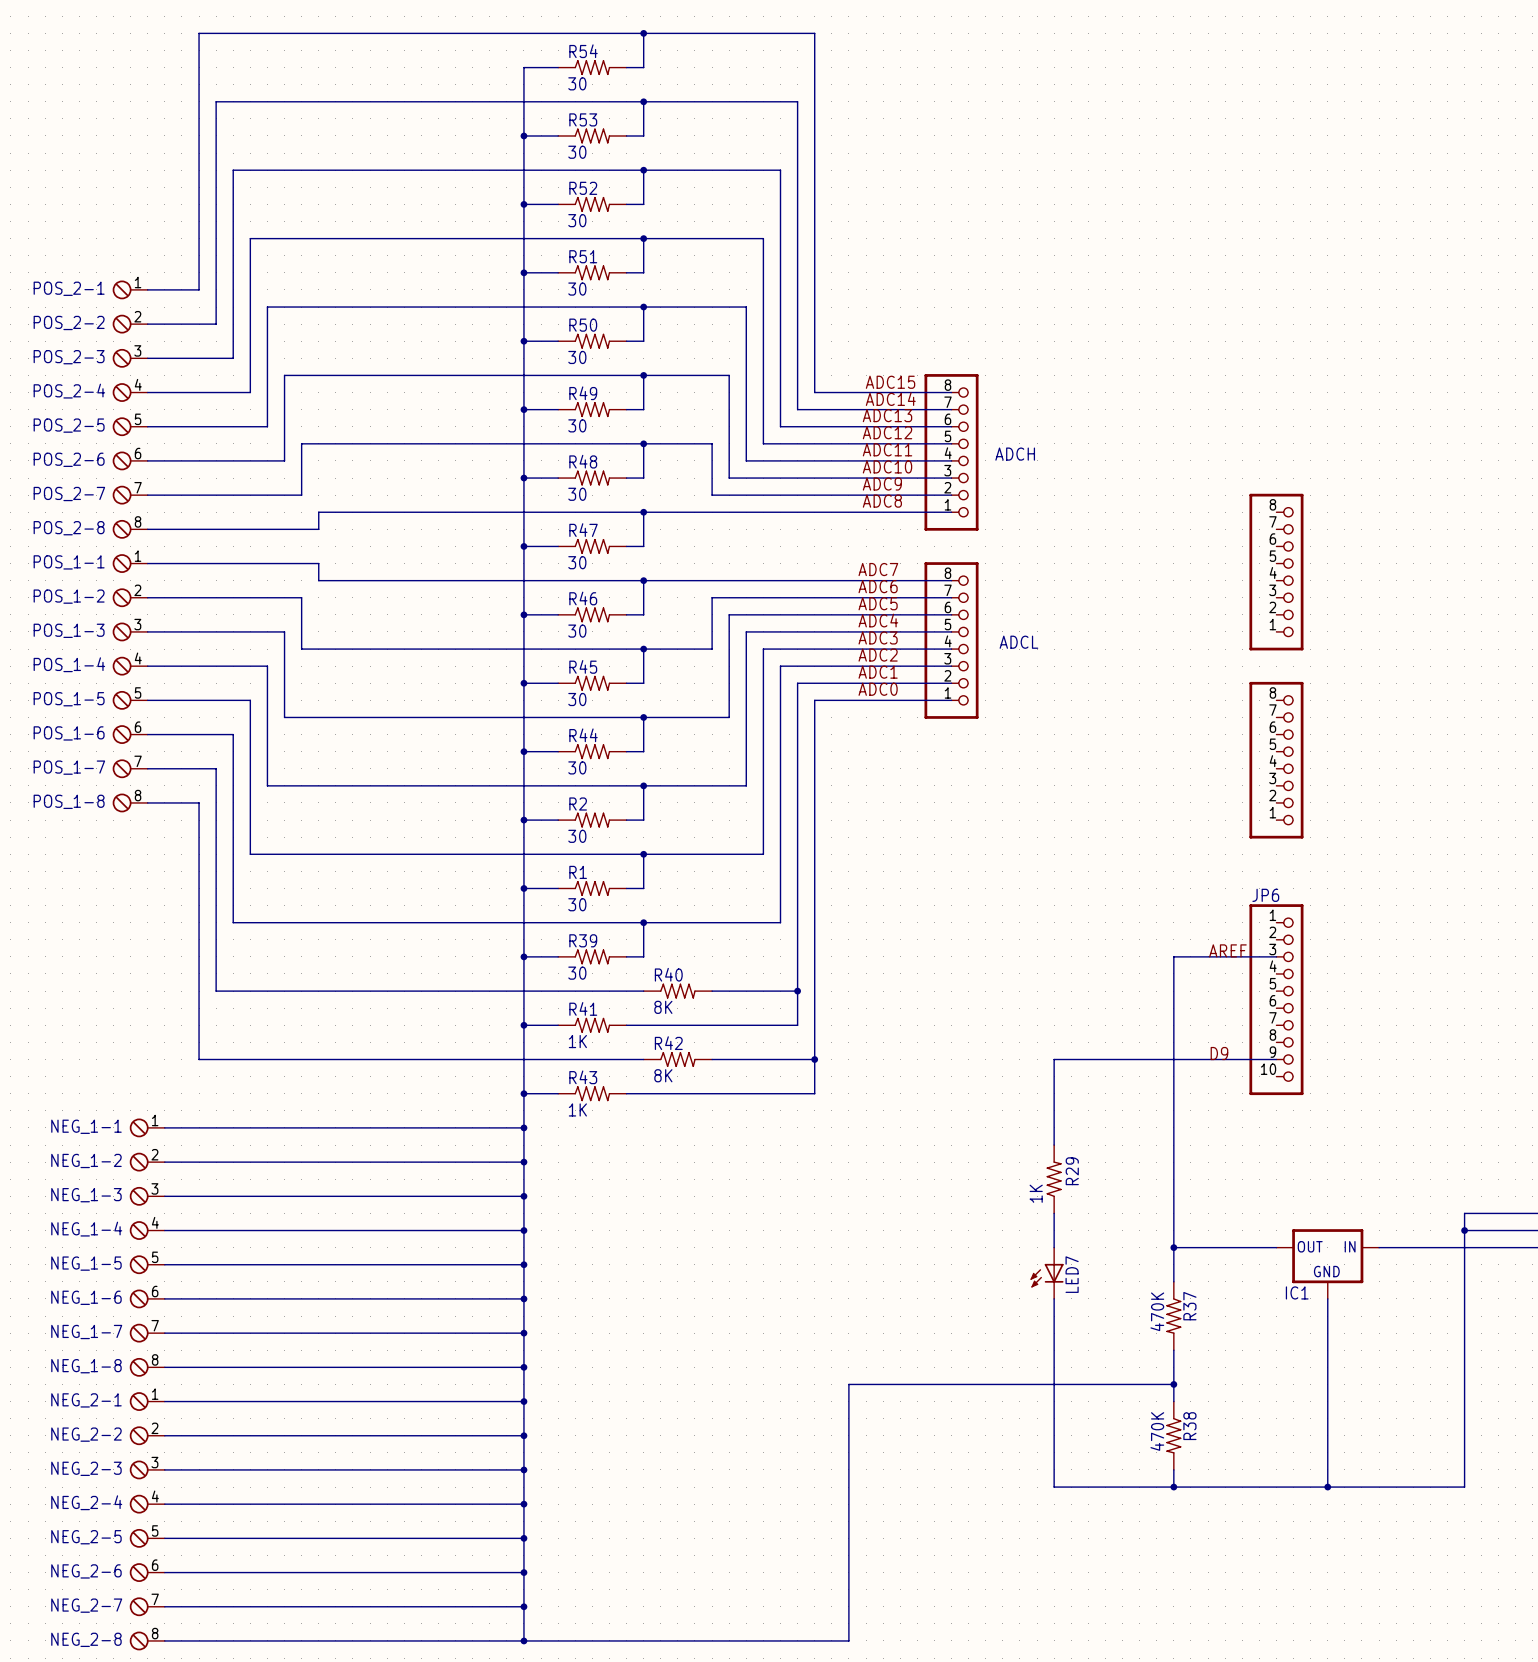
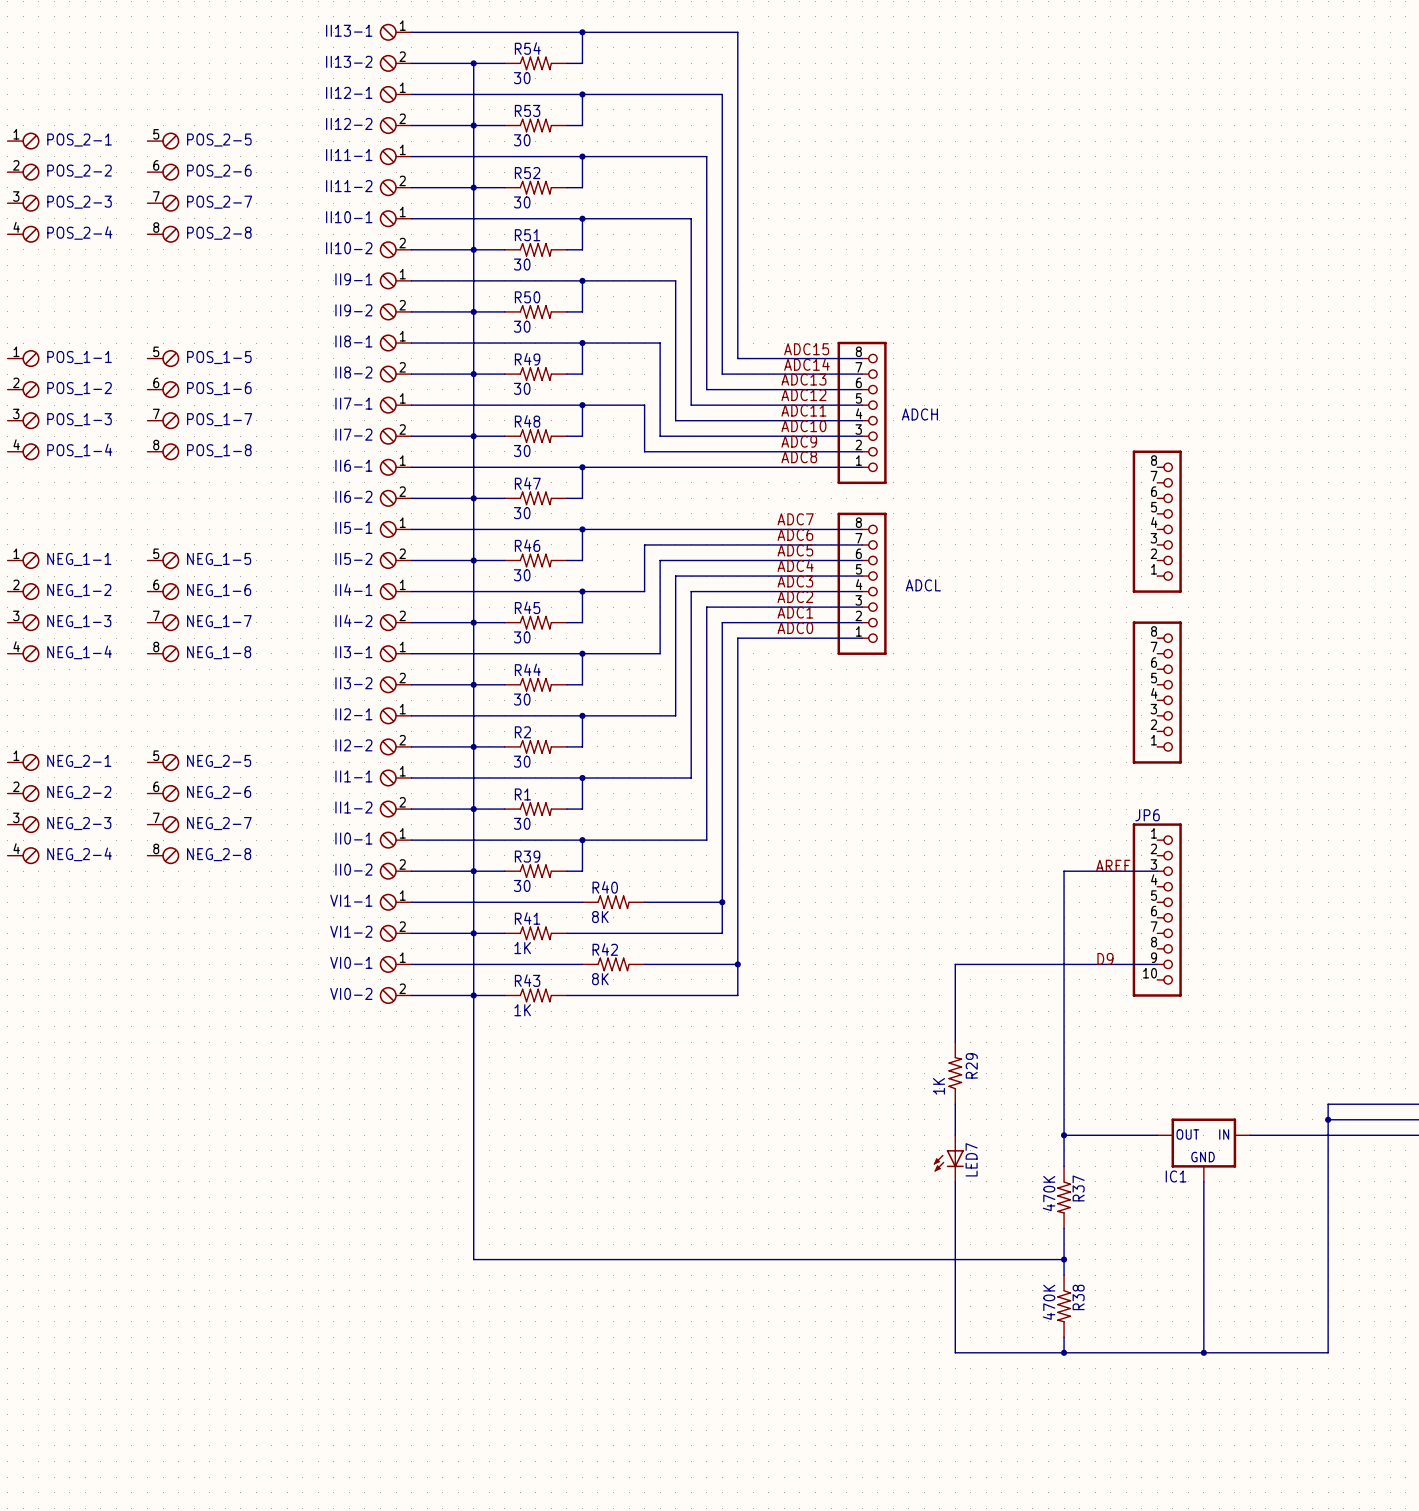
II13-1: none -> (395, 32)
wire: (455, 33) (199, 33) (199, 289) (147, 289) -> none
II13-2: none -> (395, 63)
wire: none -> (411, 63) (473, 63)
junction: none -> (473, 63)
II12-1: none -> (395, 94)
wire: (455, 101) (216, 101) (216, 324) (147, 324) -> none
II12-2: none -> (395, 125)
wire: none -> (411, 125) (473, 125)
II11-1: none -> (395, 156)
wire: (455, 170) (233, 170) (233, 358) (147, 358) -> none
II11-2: none -> (395, 187)
wire: none -> (411, 187) (473, 187)
II10-1: none -> (395, 218)
wire: (455, 238) (250, 238) (250, 392) (147, 392) -> none
II10-2: none -> (395, 249)
wire: none -> (411, 249) (473, 249)
POS_2-1 flip: as is (122, 289) -> left-right (30, 141)
POS_2-1 position: (130, 289) -> (23, 141)
II9-1: none -> (395, 280)
wire: (455, 307) (267, 307) (267, 426) (147, 426) -> none
POS_2-2 flip: as is (122, 324) -> left-right (30, 172)
POS_2-2 position: (130, 324) -> (23, 172)
II9-2: none -> (395, 311)
wire: none -> (411, 311) (473, 311)
POS_2-3 flip: as is (122, 358) -> left-right (30, 203)
POS_2-3 position: (130, 358) -> (23, 203)
II8-1: none -> (395, 343)
wire: (455, 375) (284, 375) (284, 460) (147, 460) -> none
POS_2-4 flip: as is (122, 392) -> left-right (30, 234)
POS_2-4 position: (130, 392) -> (23, 234)
II8-2: none -> (395, 374)
wire: none -> (411, 374) (473, 374)
POS_2-5 flip: as is (122, 426) -> left-right (170, 141)
POS_2-5 position: (130, 426) -> (163, 141)
II7-1: none -> (395, 405)
wire: (455, 443) (301, 443) (301, 495) (147, 495) -> none
POS_2-6 flip: as is (122, 460) -> left-right (170, 172)
POS_2-6 position: (130, 460) -> (163, 172)
II7-2: none -> (395, 436)
wire: none -> (411, 436) (473, 436)
POS_2-7 flip: as is (122, 495) -> left-right (170, 203)
POS_2-7 position: (130, 495) -> (163, 203)
II6-1: none -> (395, 467)
wire: (455, 512) (318, 512) (318, 529) (147, 529) -> none
POS_2-8 flip: as is (122, 529) -> left-right (170, 234)
POS_2-8 position: (130, 529) -> (163, 234)
II6-2: none -> (395, 498)
wire: none -> (411, 498) (473, 498)
POS_1-1 flip: as is (122, 563) -> left-right (30, 358)
POS_1-1 position: (130, 563) -> (23, 358)
wire: (147, 563) (318, 563) (318, 580) (455, 580) -> none
II5-1: none -> (395, 529)
POS_1-2 flip: as is (122, 597) -> left-right (30, 389)
POS_1-2 position: (130, 597) -> (23, 389)
wire: (147, 597) (301, 597) (301, 649) (455, 649) -> none
II5-2: none -> (395, 560)
wire: none -> (411, 560) (473, 560)
POS_1-3 flip: as is (122, 631) -> left-right (30, 420)
POS_1-3 position: (130, 631) -> (23, 420)
wire: (147, 631) (284, 631) (284, 717) (455, 717) -> none
II4-1: none -> (395, 591)
POS_1-4 flip: as is (122, 666) -> left-right (30, 451)
POS_1-4 position: (130, 666) -> (23, 451)
wire: (147, 666) (267, 666) (267, 785) (455, 785) -> none
II4-2: none -> (395, 622)
wire: none -> (411, 622) (473, 622)
POS_1-5 flip: as is (122, 700) -> left-right (170, 358)
POS_1-5 position: (130, 700) -> (163, 358)
wire: (147, 700) (250, 700) (250, 854) (455, 854) -> none
II3-1: none -> (395, 653)
POS_1-6 flip: as is (122, 734) -> left-right (170, 389)
POS_1-6 position: (130, 734) -> (163, 389)
wire: (147, 734) (233, 734) (233, 922) (455, 922) -> none
II3-2: none -> (395, 684)
wire: none -> (411, 684) (473, 684)
POS_1-7 flip: as is (122, 768) -> left-right (170, 420)
POS_1-7 position: (130, 768) -> (163, 420)
wire: (147, 768) (216, 768) (216, 991) (455, 991) -> none
II2-1: none -> (395, 715)
POS_1-8 flip: as is (122, 802) -> left-right (170, 451)
POS_1-8 position: (130, 802) -> (163, 451)
wire: (147, 802) (199, 802) (199, 1059) (455, 1059) -> none
II2-2: none -> (395, 746)
wire: none -> (411, 746) (473, 746)
II1-1: none -> (395, 777)
II1-2: none -> (395, 809)
wire: none -> (411, 809) (473, 809)
II0-1: none -> (395, 840)
II0-2: none -> (395, 871)
wire: none -> (411, 871) (473, 871)
VI1-1: none -> (395, 902)
VI1-2: none -> (395, 933)
wire: none -> (411, 933) (473, 933)
VI0-1: none -> (395, 964)
VI0-2: none -> (395, 995)
wire: none -> (411, 995) (473, 995)
NEG_1-1 flip: as is (139, 1127) -> left-right (30, 560)
NEG_1-1 position: (147, 1127) -> (23, 560)
wire: (164, 1127) (523, 1127) -> none
junction: (523, 1127) -> none
NEG_1-2 flip: as is (139, 1162) -> left-right (30, 591)
NEG_1-2 position: (147, 1162) -> (23, 591)
wire: (164, 1162) (523, 1162) -> none
junction: (523, 1162) -> none
NEG_1-3 flip: as is (139, 1196) -> left-right (30, 622)
NEG_1-3 position: (147, 1196) -> (23, 622)
wire: (164, 1196) (523, 1196) -> none
junction: (523, 1196) -> none
NEG_1-4 flip: as is (139, 1230) -> left-right (30, 653)
NEG_1-4 position: (147, 1230) -> (23, 653)
wire: (164, 1230) (523, 1230) -> none
junction: (523, 1230) -> none
NEG_1-5 flip: as is (139, 1264) -> left-right (170, 560)
NEG_1-5 position: (147, 1264) -> (163, 560)
wire: (164, 1264) (523, 1264) -> none
junction: (523, 1264) -> none
NEG_1-6 flip: as is (139, 1298) -> left-right (170, 591)
NEG_1-6 position: (147, 1298) -> (163, 591)
wire: (164, 1298) (523, 1298) -> none
junction: (523, 1298) -> none
NEG_1-7 flip: as is (139, 1333) -> left-right (170, 622)
NEG_1-7 position: (147, 1333) -> (163, 622)
wire: (164, 1333) (523, 1333) -> none
junction: (523, 1333) -> none
NEG_1-8 flip: as is (139, 1367) -> left-right (170, 653)
NEG_1-8 position: (147, 1367) -> (163, 653)
wire: (164, 1367) (523, 1367) -> none
junction: (523, 1367) -> none
wire: (523, 1384) (523, 1640) -> (473, 1259) (768, 1259)
wire: (848, 1384) (848, 1640) (164, 1640) -> none
NEG_2-1 flip: as is (139, 1401) -> left-right (30, 762)
NEG_2-1 position: (147, 1401) -> (23, 762)
wire: (164, 1401) (523, 1401) -> none
junction: (523, 1401) -> none
NEG_2-2 flip: as is (139, 1435) -> left-right (30, 793)
NEG_2-2 position: (147, 1435) -> (23, 793)
wire: (164, 1435) (523, 1435) -> none
junction: (523, 1435) -> none
NEG_2-3 flip: as is (139, 1469) -> left-right (30, 824)
NEG_2-3 position: (147, 1469) -> (23, 824)
wire: (164, 1469) (523, 1469) -> none
junction: (523, 1469) -> none
NEG_2-4 flip: as is (139, 1504) -> left-right (30, 855)
NEG_2-4 position: (147, 1504) -> (23, 855)
wire: (164, 1504) (523, 1504) -> none
junction: (523, 1504) -> none
NEG_2-5 flip: as is (139, 1538) -> left-right (170, 762)
NEG_2-5 position: (147, 1538) -> (163, 762)
wire: (164, 1538) (523, 1538) -> none
junction: (523, 1538) -> none
NEG_2-6 flip: as is (139, 1572) -> left-right (170, 793)
NEG_2-6 position: (147, 1572) -> (163, 793)
wire: (164, 1572) (523, 1572) -> none
junction: (523, 1572) -> none
NEG_2-7 flip: as is (139, 1606) -> left-right (170, 824)
NEG_2-7 position: (147, 1606) -> (163, 824)
wire: (164, 1606) (523, 1606) -> none
junction: (523, 1606) -> none
NEG_2-8 flip: as is (139, 1640) -> left-right (170, 855)
NEG_2-8 position: (147, 1640) -> (163, 855)
junction: (523, 1640) -> none

